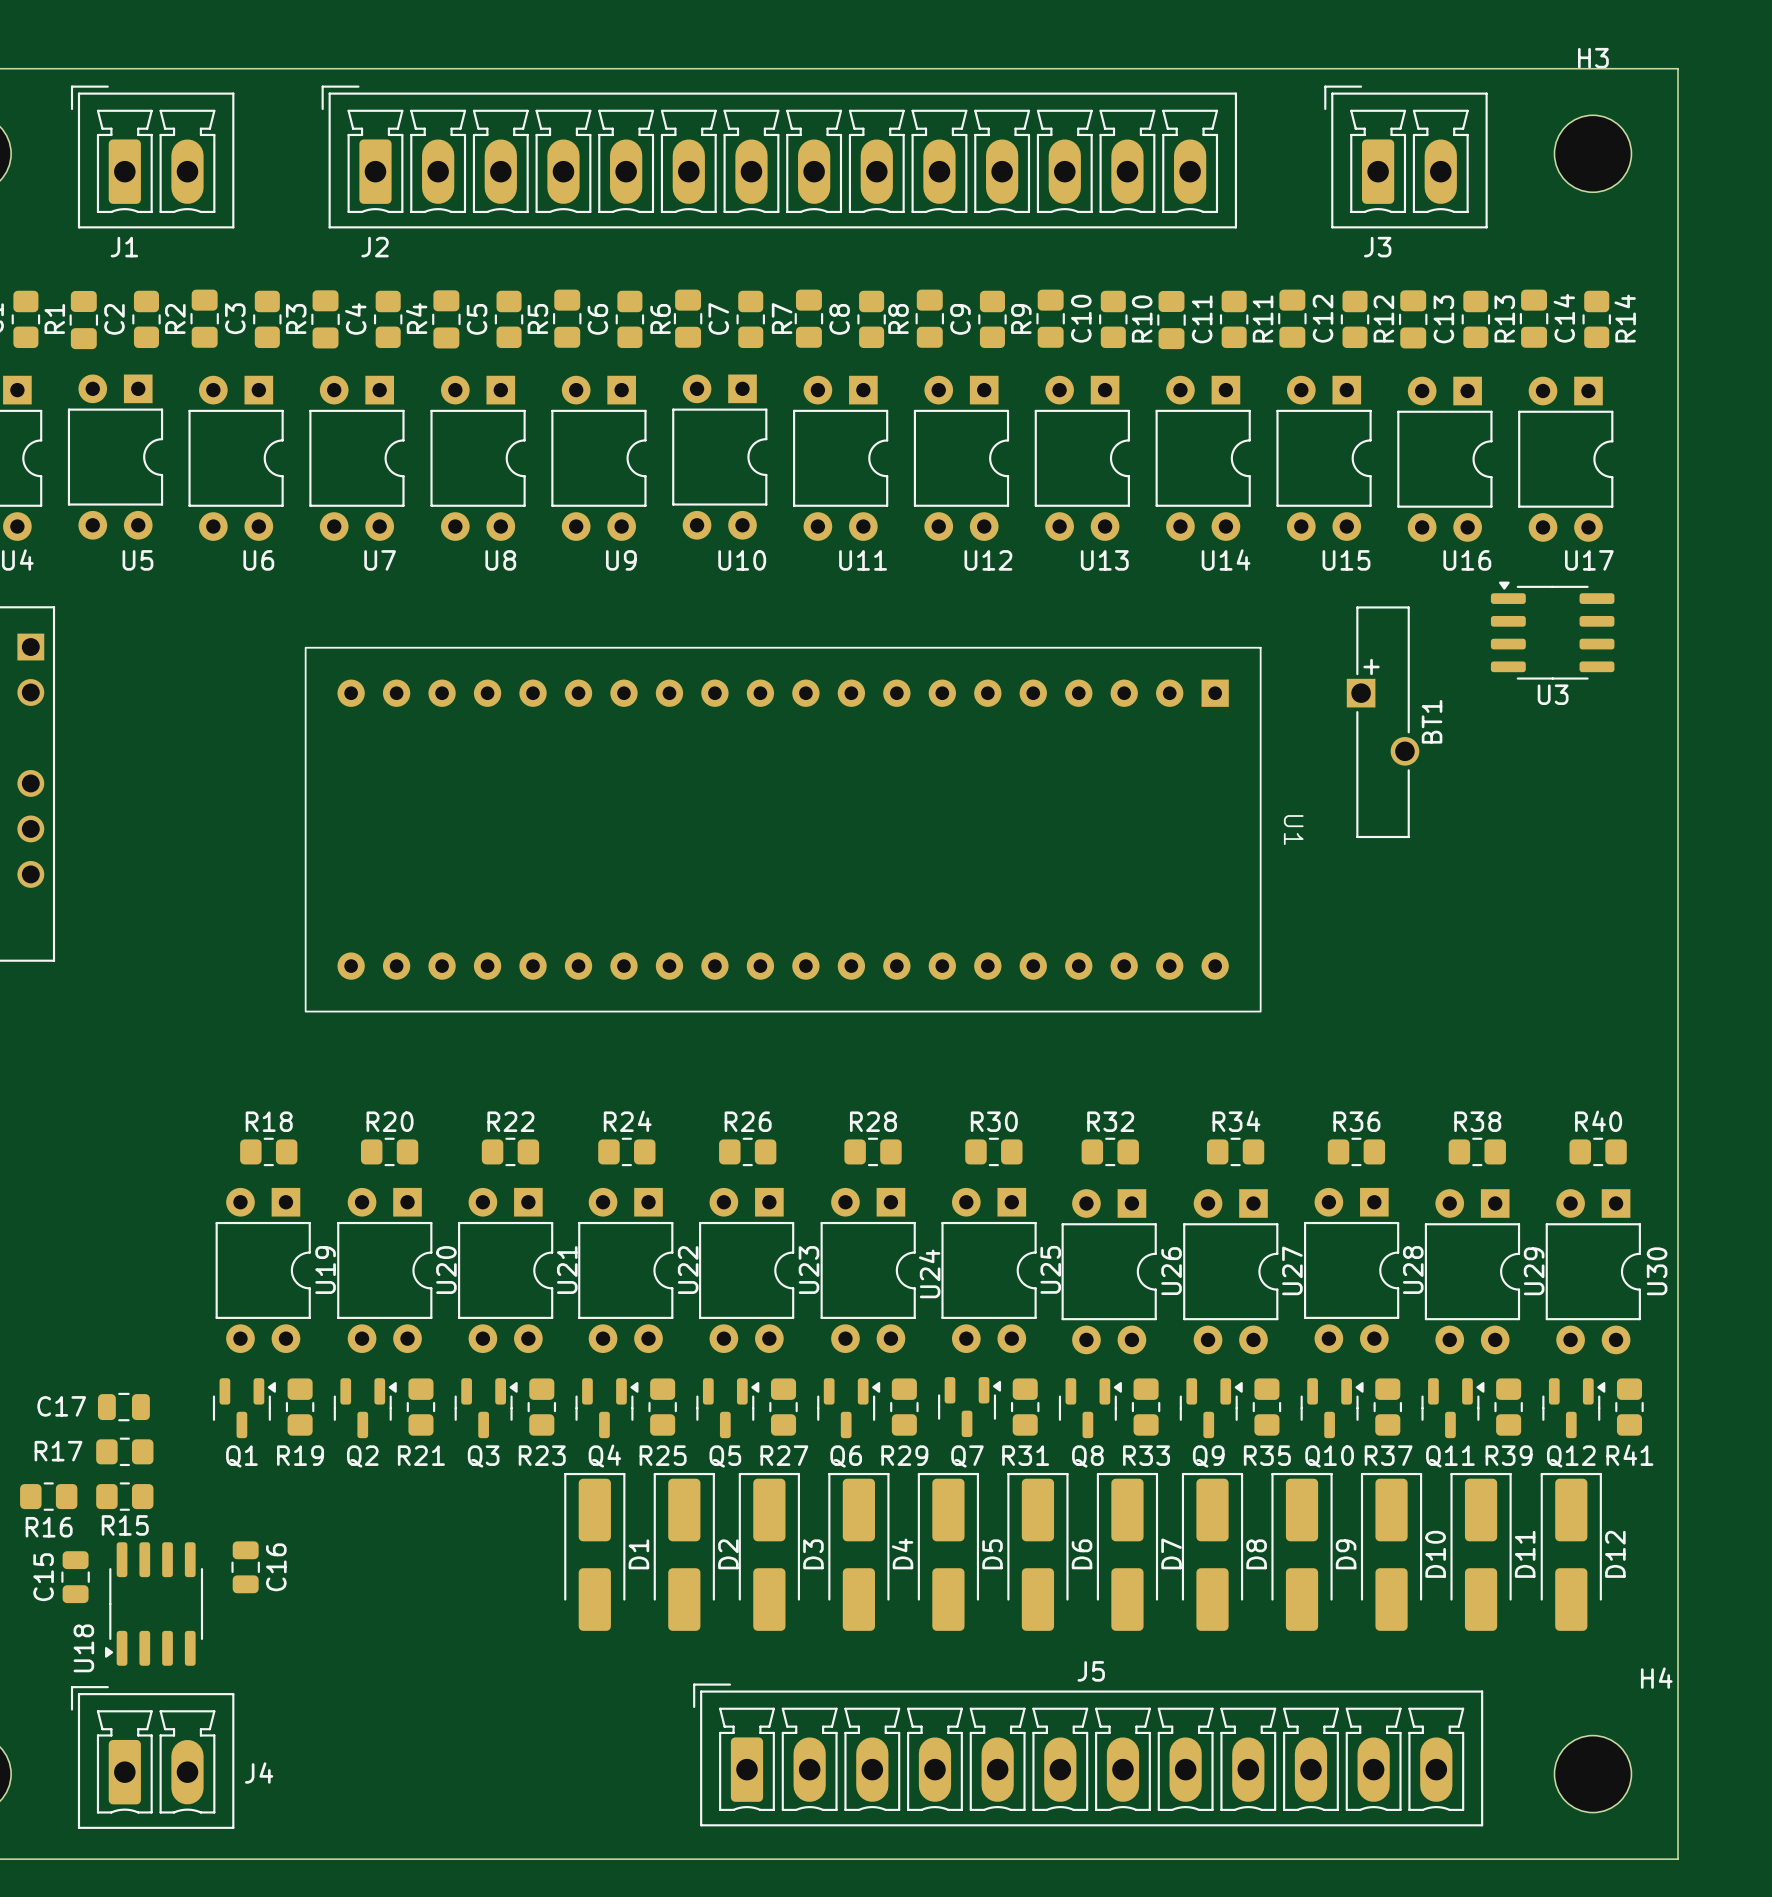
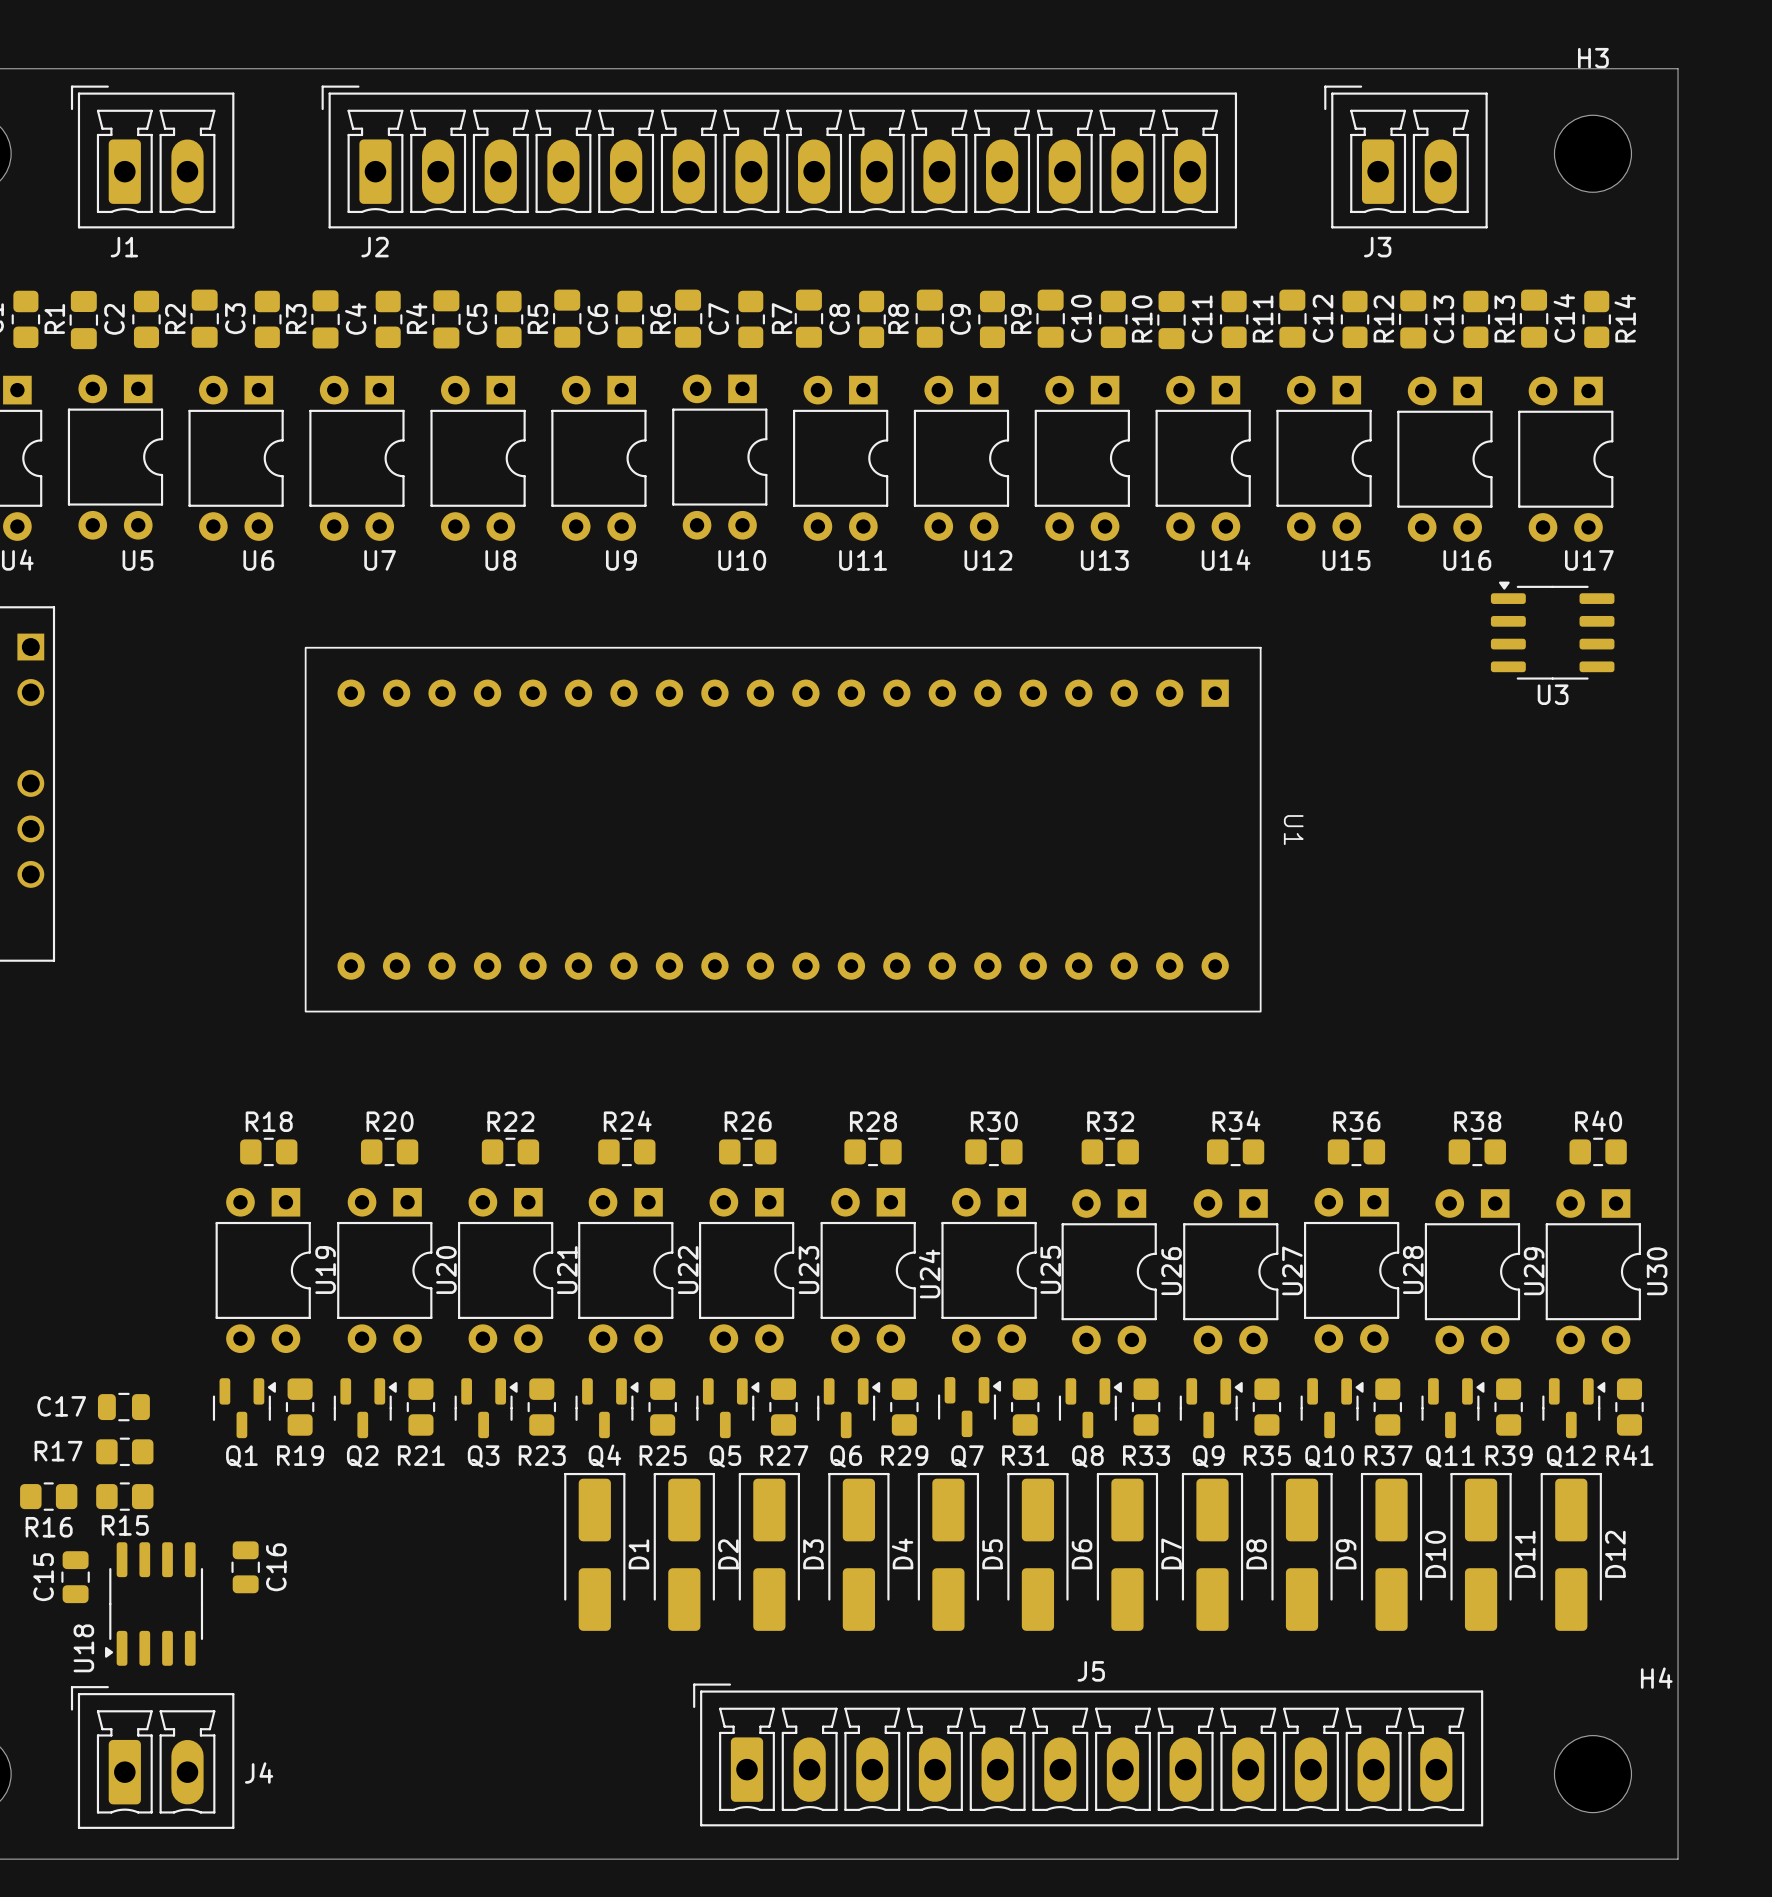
BT1: (1383, 722) -> none

